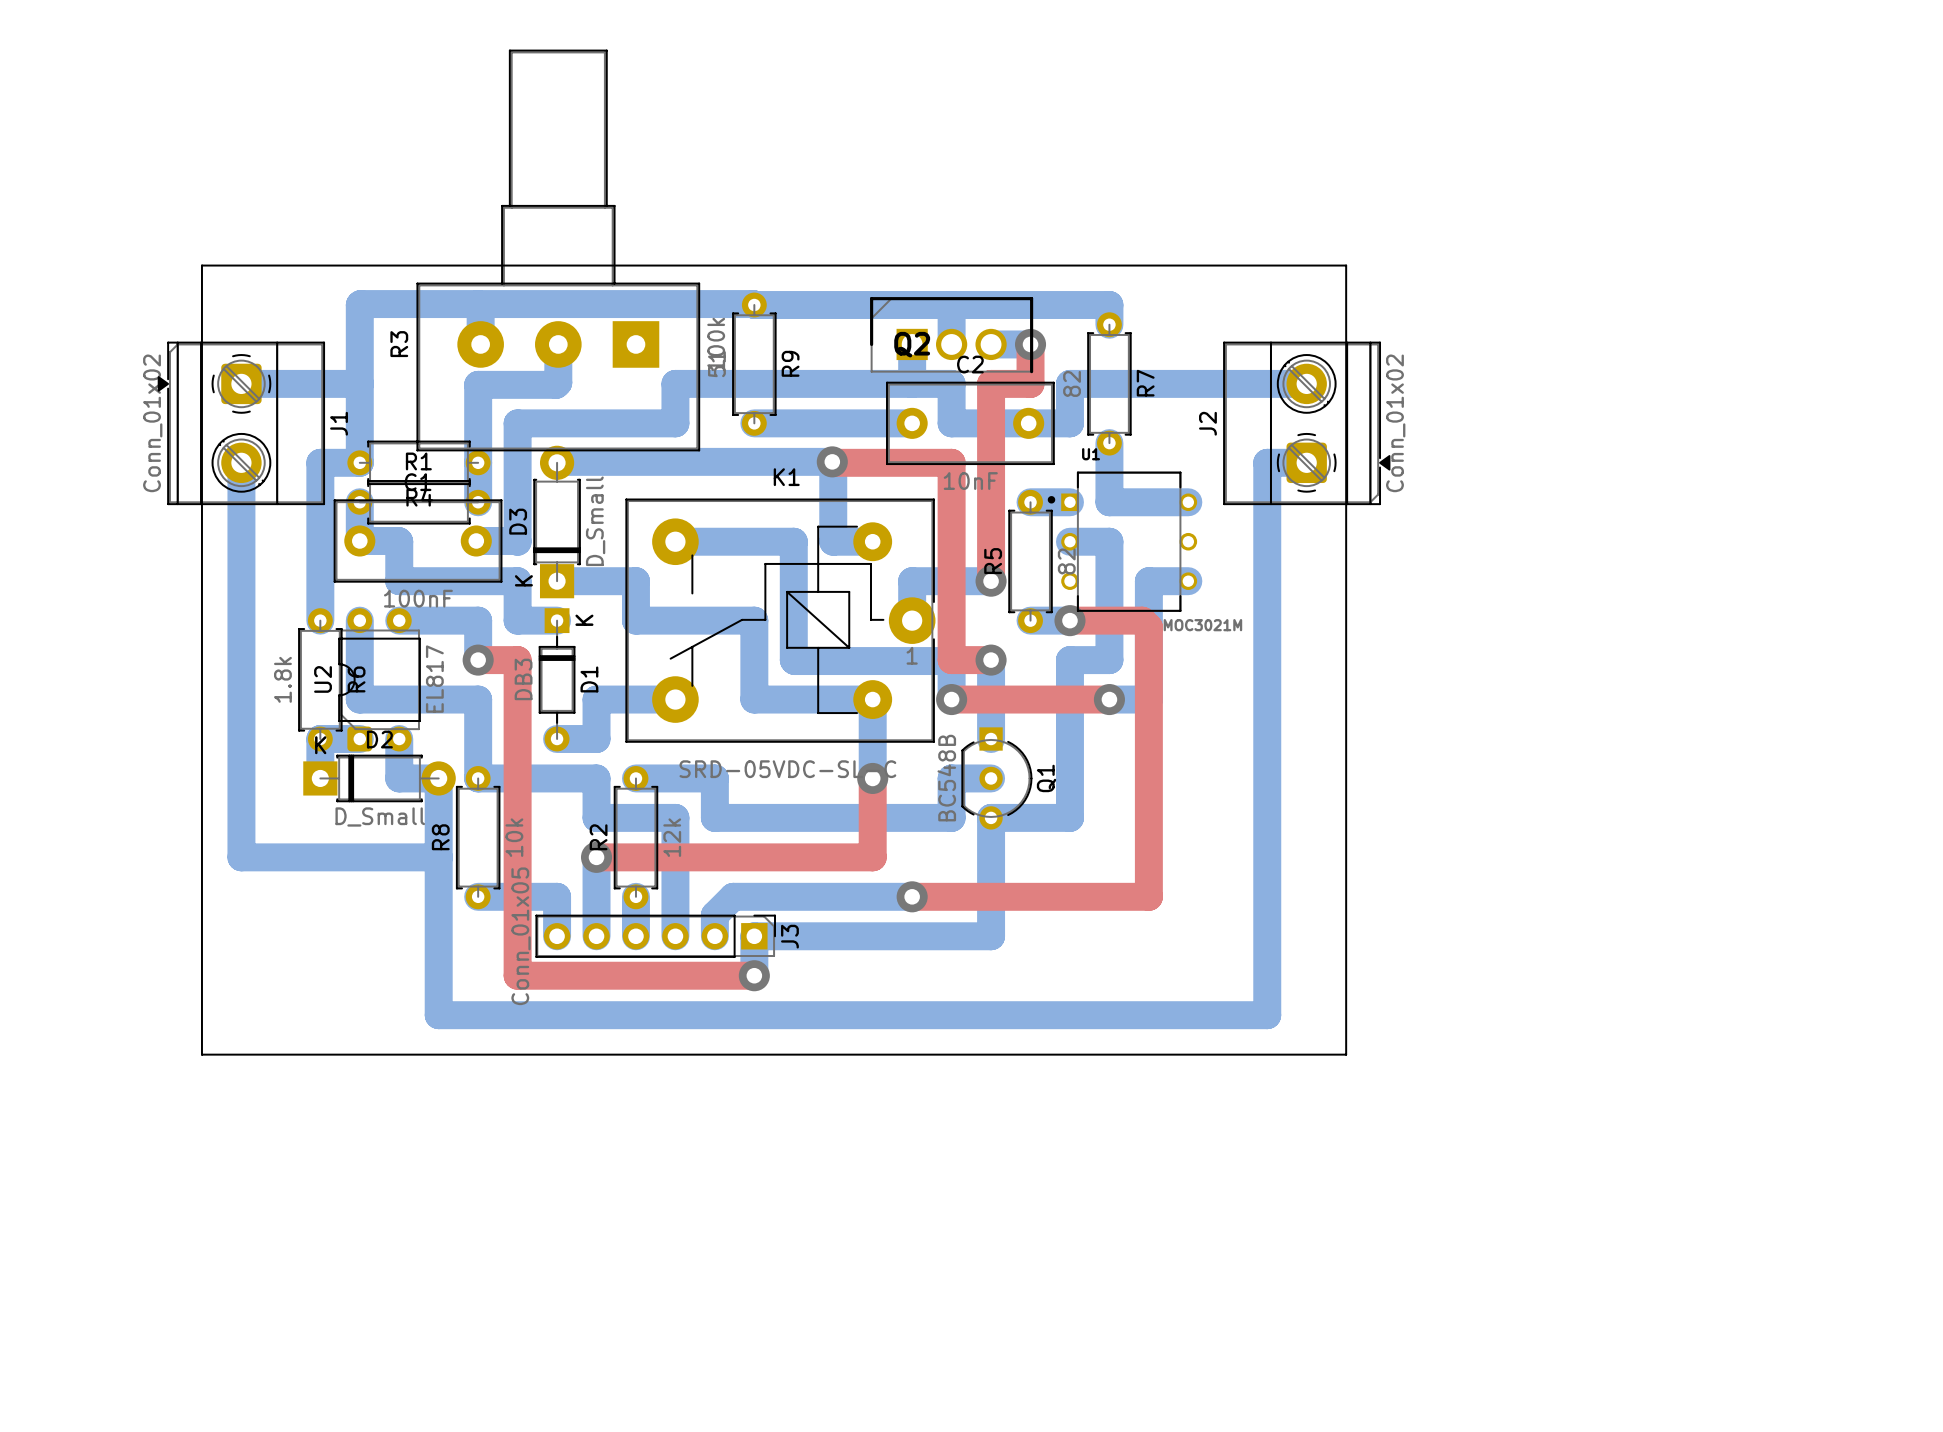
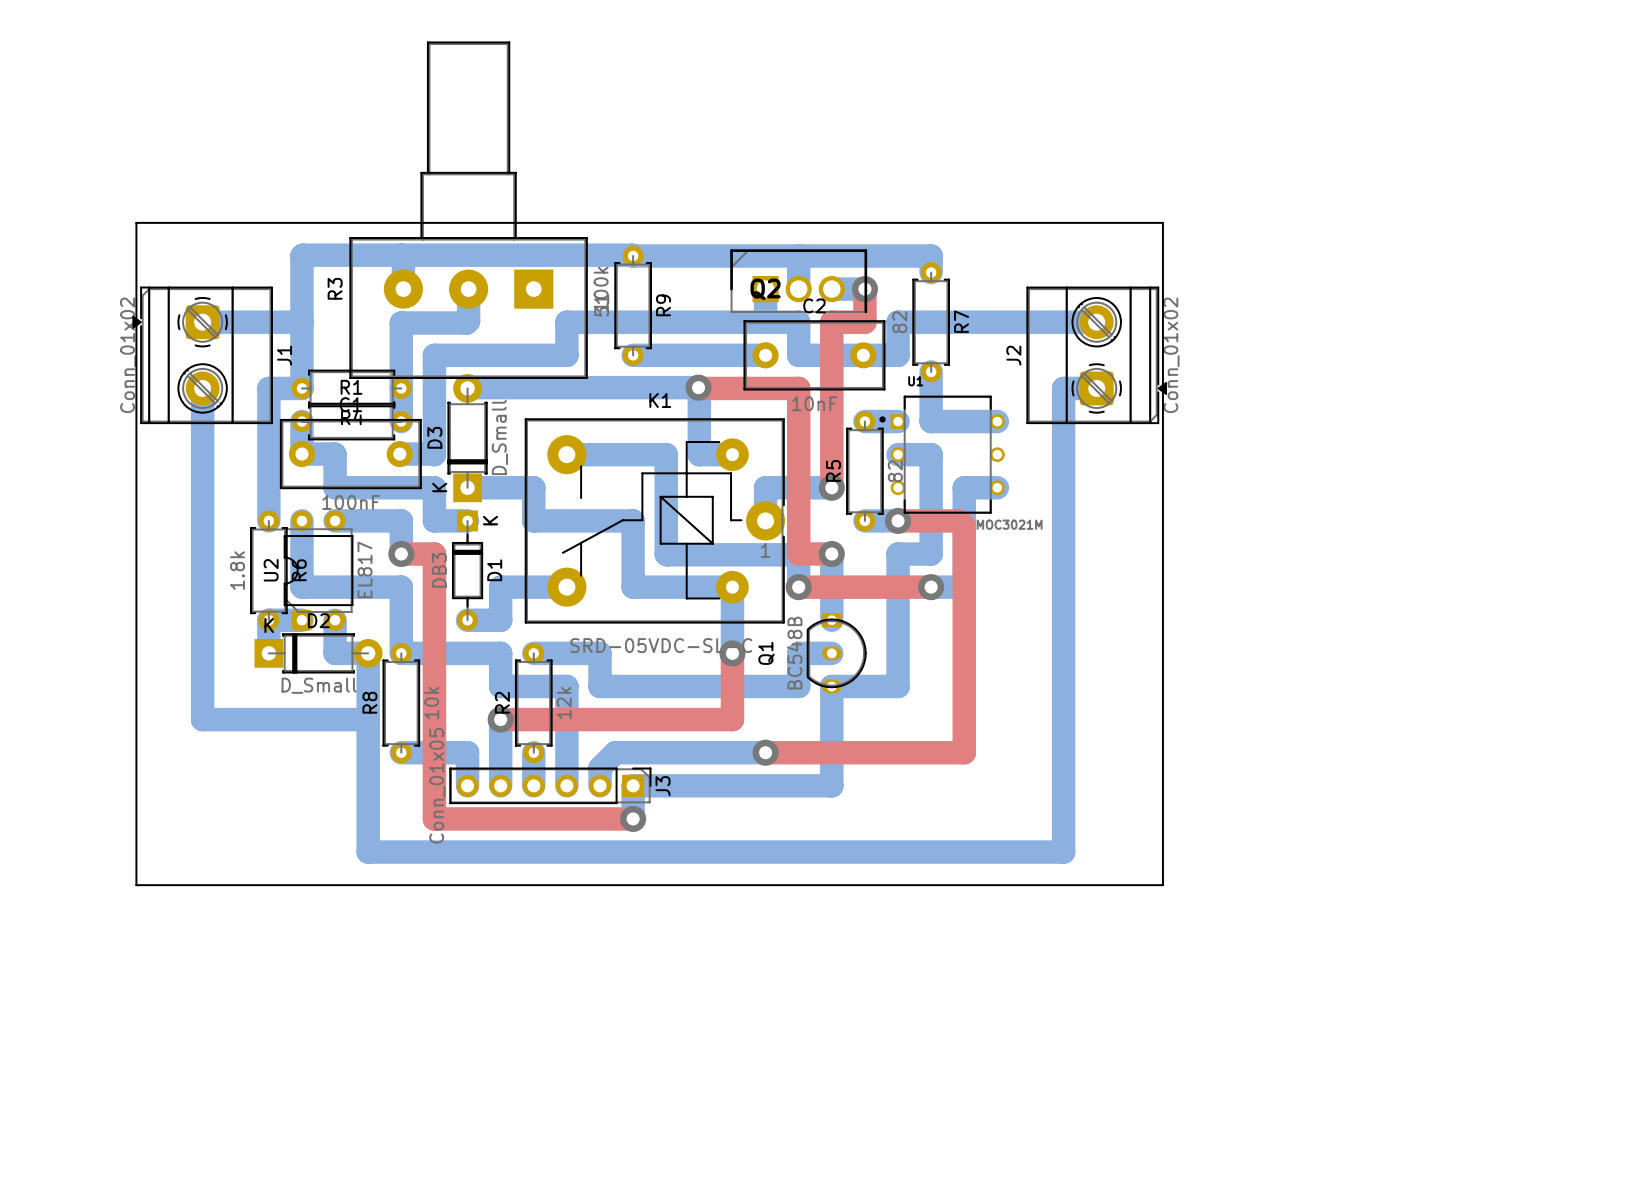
board edge: (201, 265) (201, 1054) -> (169, 222) (136, 222) (136, 885) (169, 885)
board edge: (1346, 265) (1346, 1054) -> (1129, 222) (1162, 222) (1162, 885) (1129, 885)
Q1 footprint: [961, 727, 1033, 830] -> [806, 613, 867, 694]
Q1 name position: Q1 (1046, 778) -> Q1 (766, 653)

